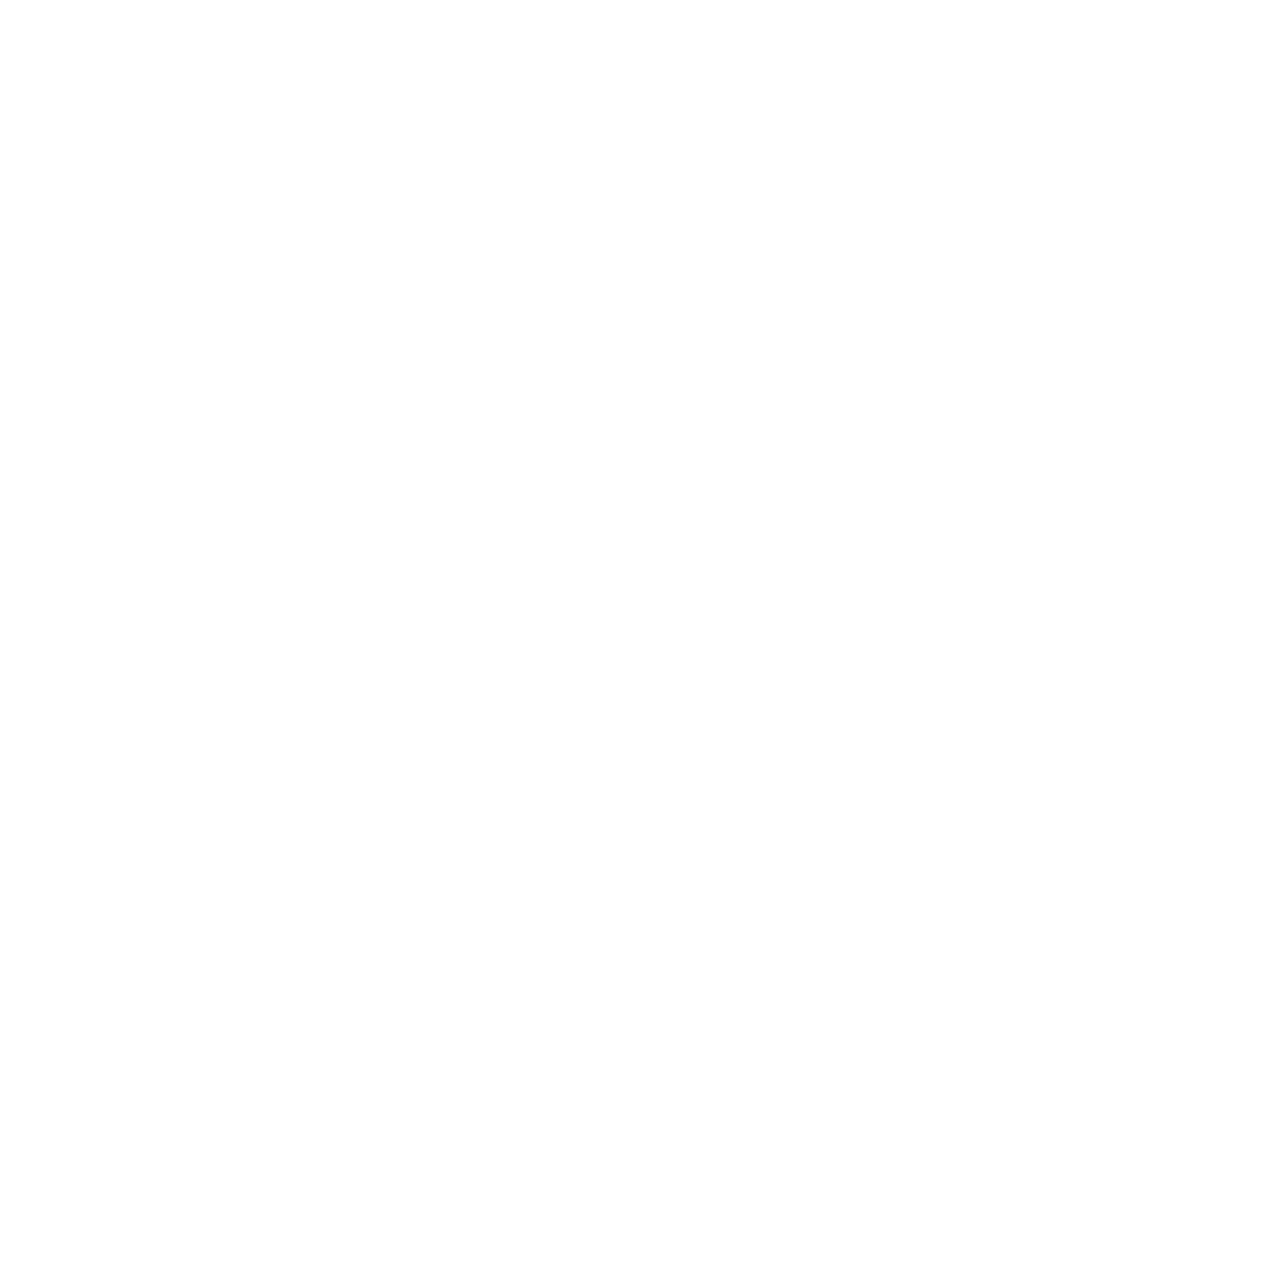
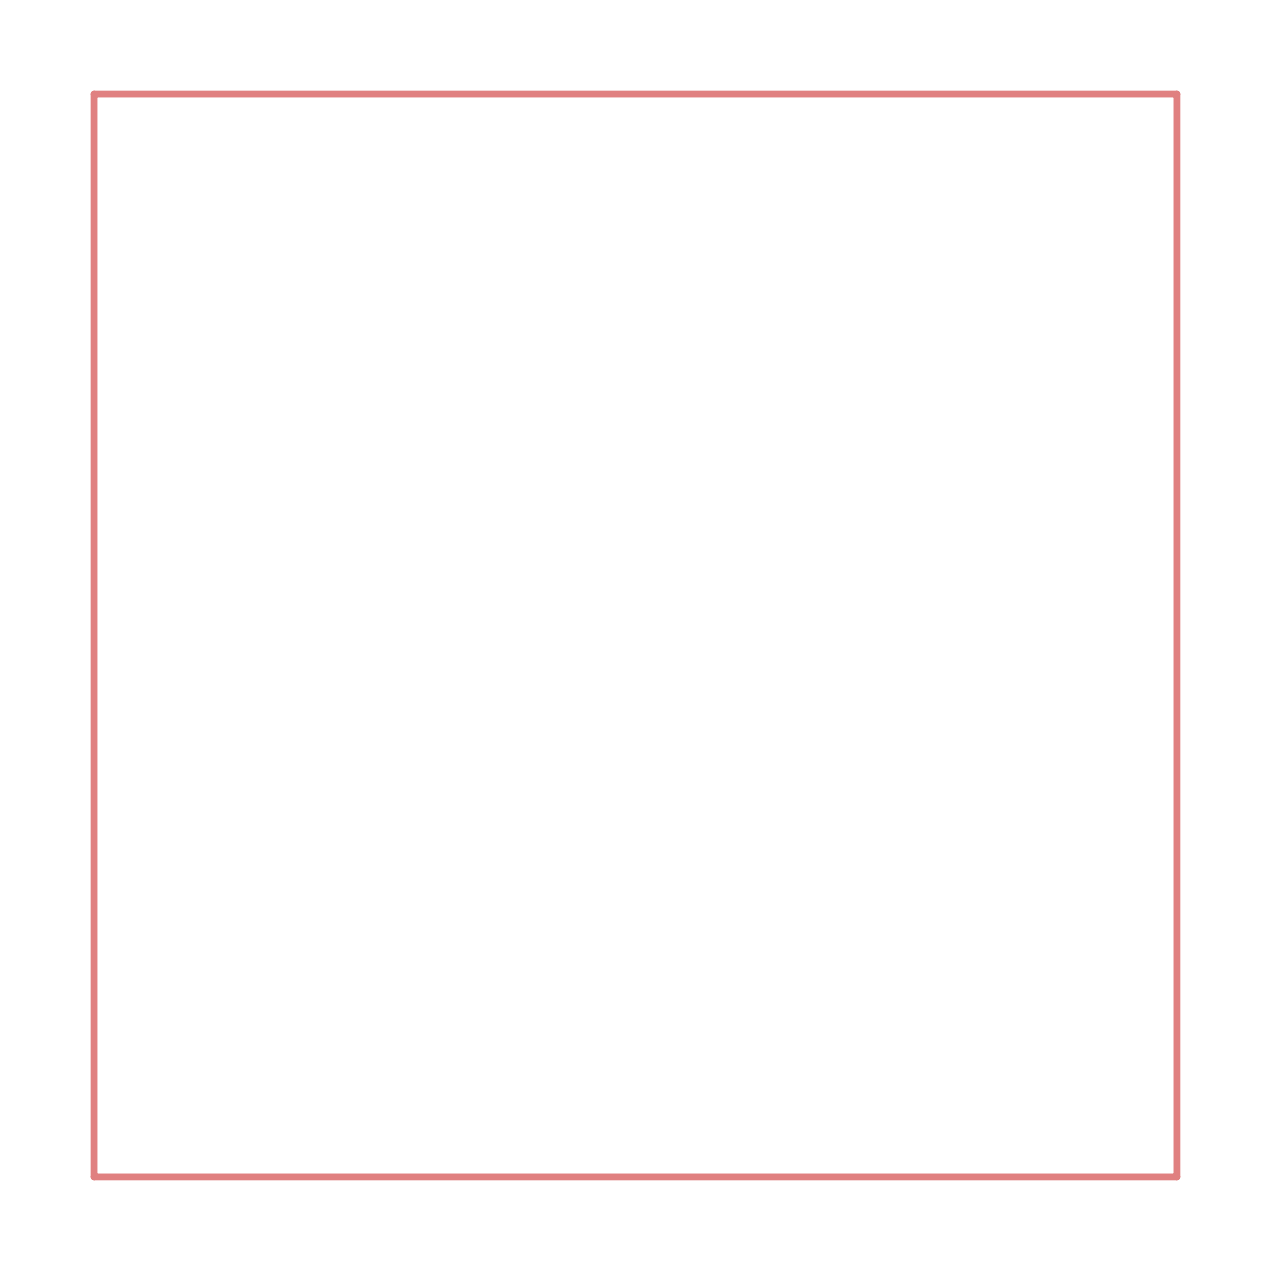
top track: none -> (94, 94) (1176, 94) (1176, 1176) (94, 1176) (94, 94)

